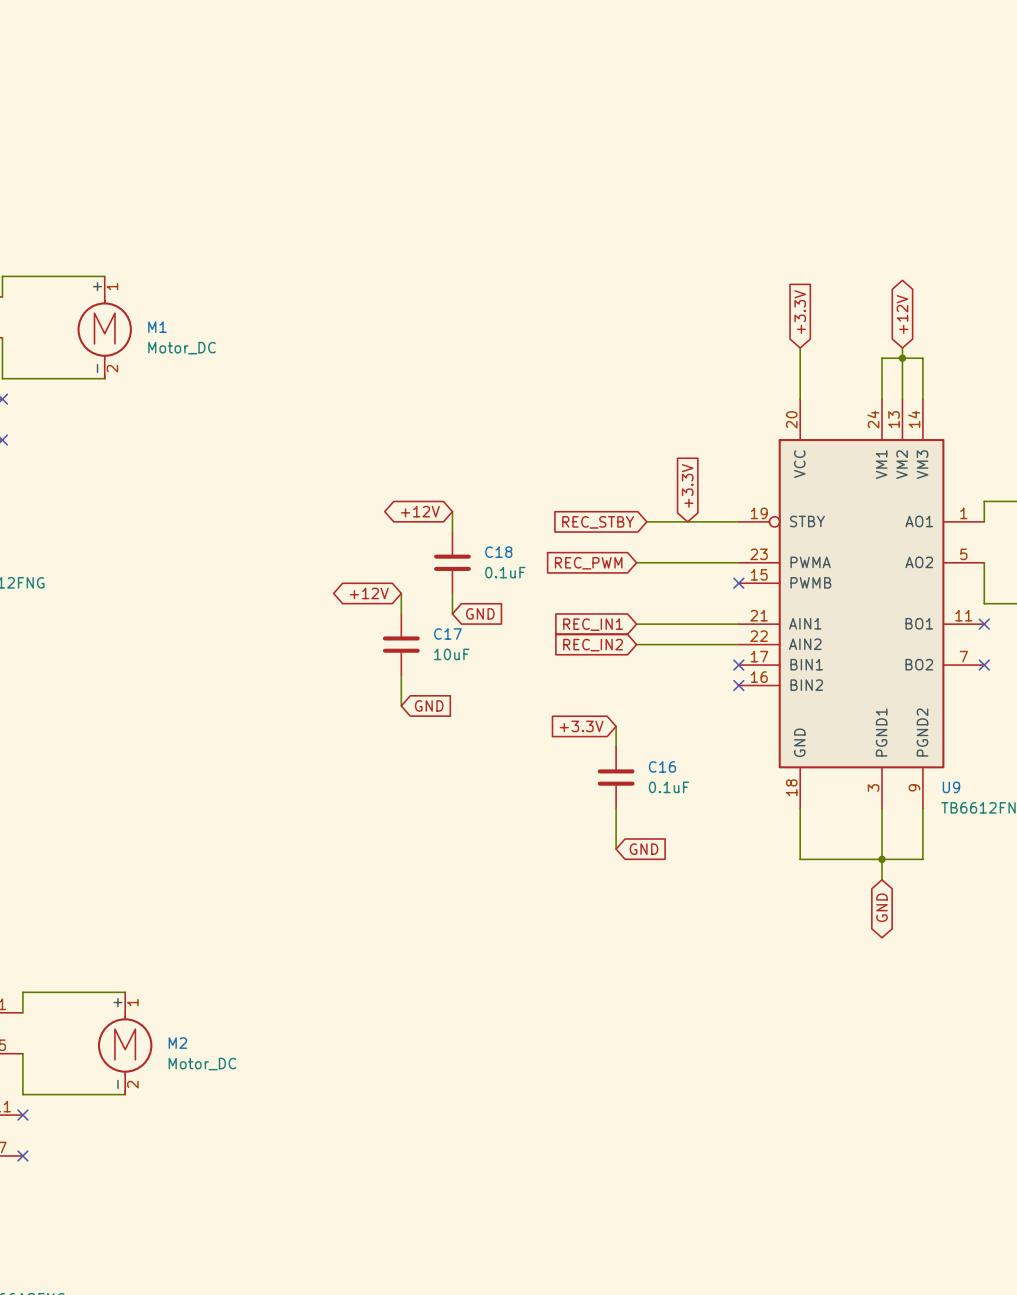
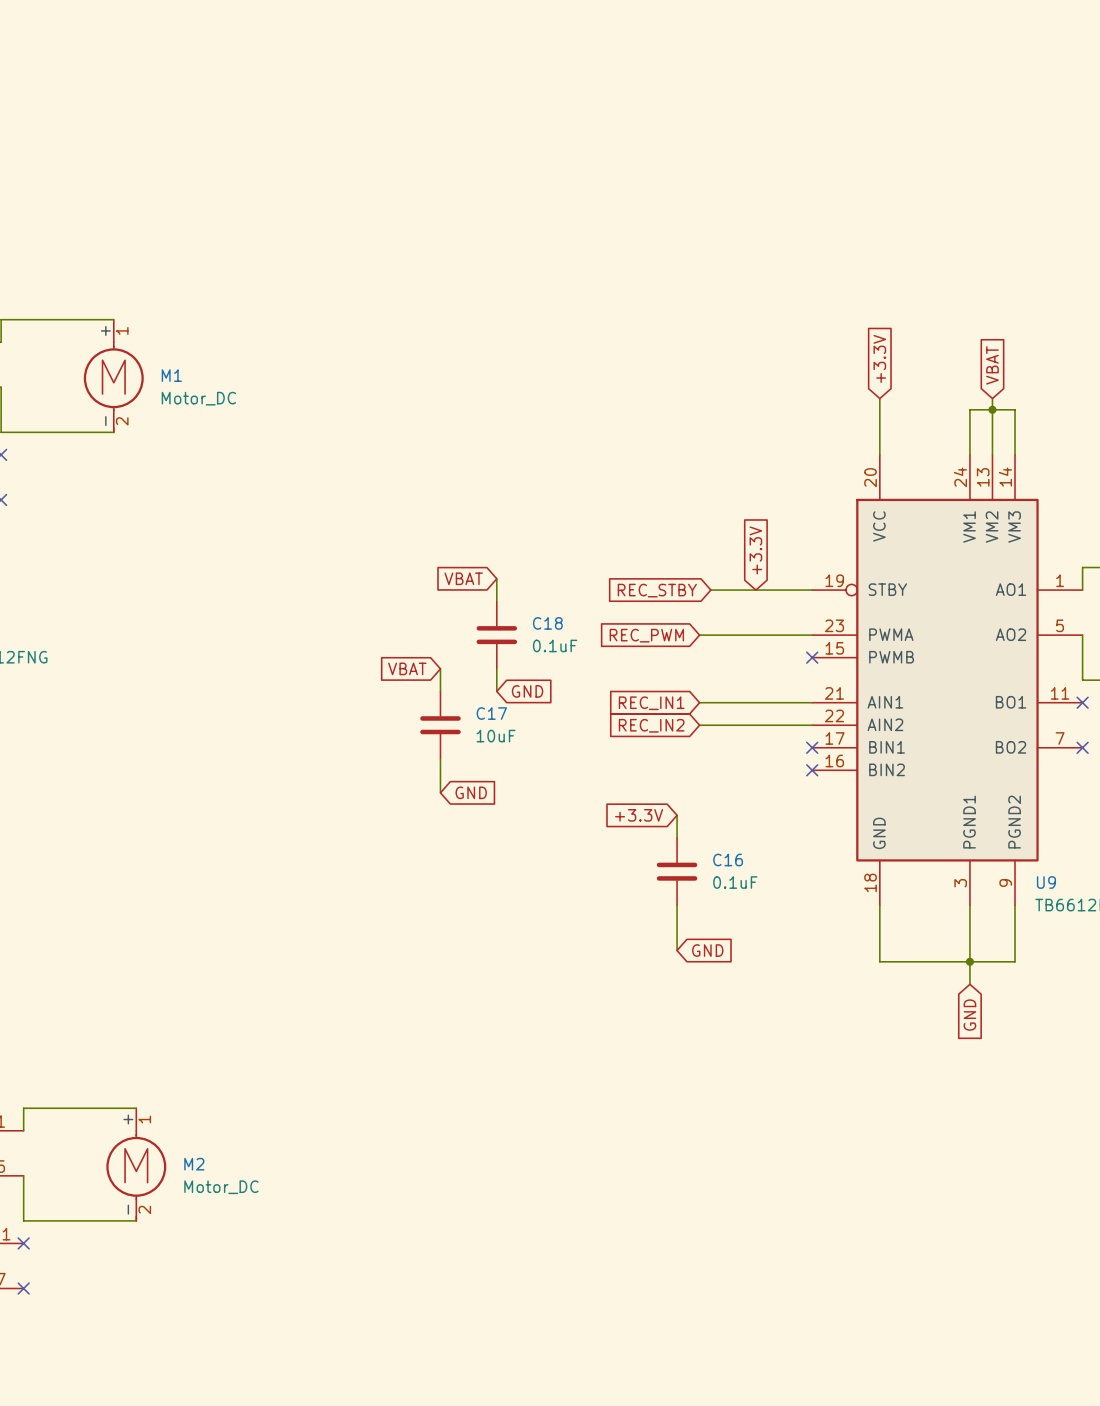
global label shape: bidirectional (902, 314) -> input (992, 365)
global label: +12V (902, 314) -> VBAT (992, 365)
global label shape: bidirectional (420, 511) -> input (463, 578)
global label: +12V (420, 511) -> VBAT (463, 578)
global label shape: bidirectional (369, 593) -> input (407, 668)
global label: +12V (369, 593) -> VBAT (407, 668)
global label shape: bidirectional (882, 907) -> input (969, 1015)

